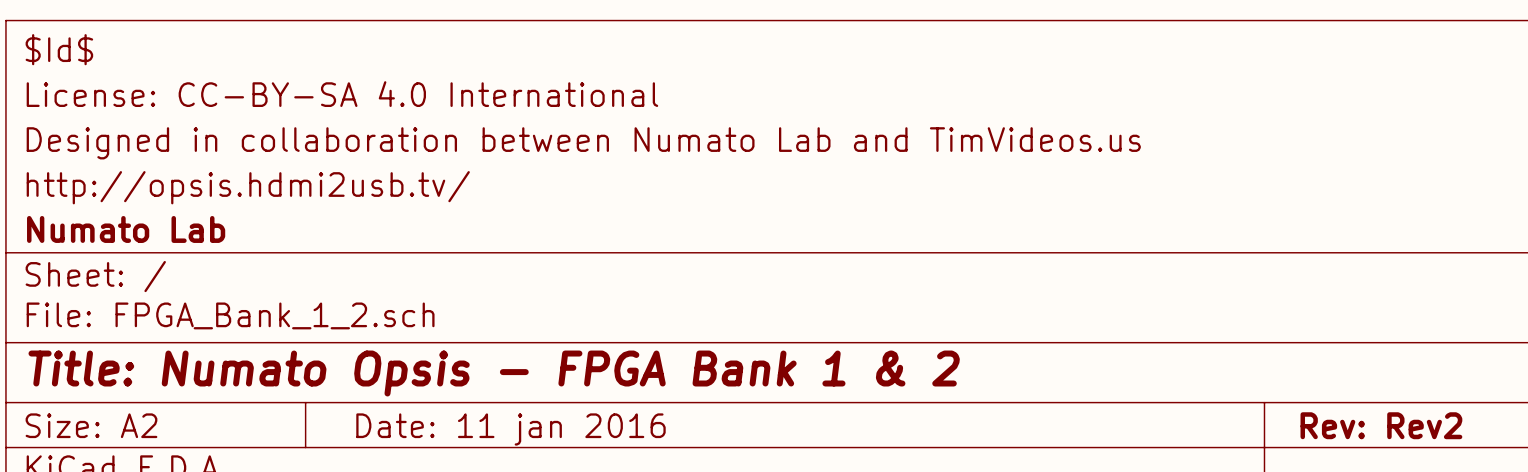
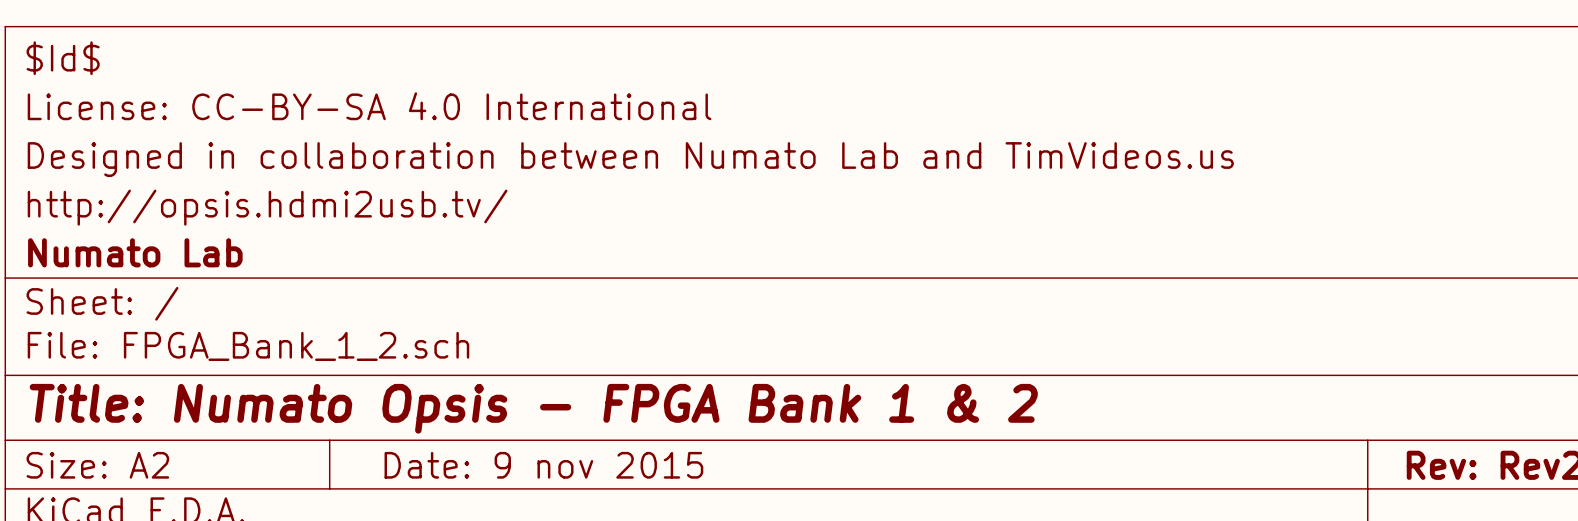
title block: Date: 11 jan 2016 (510, 429) -> Date: 9 nov 2015 (543, 465)

